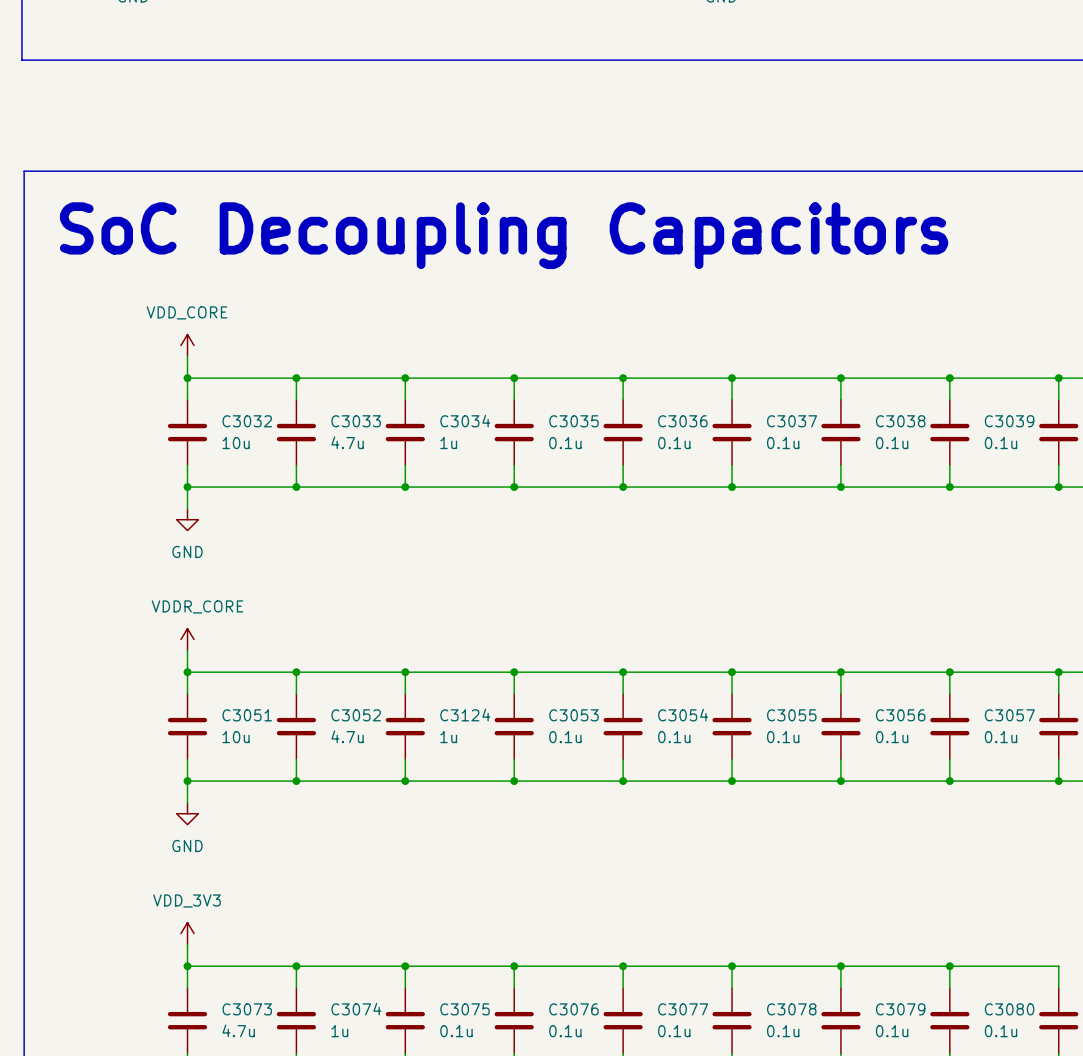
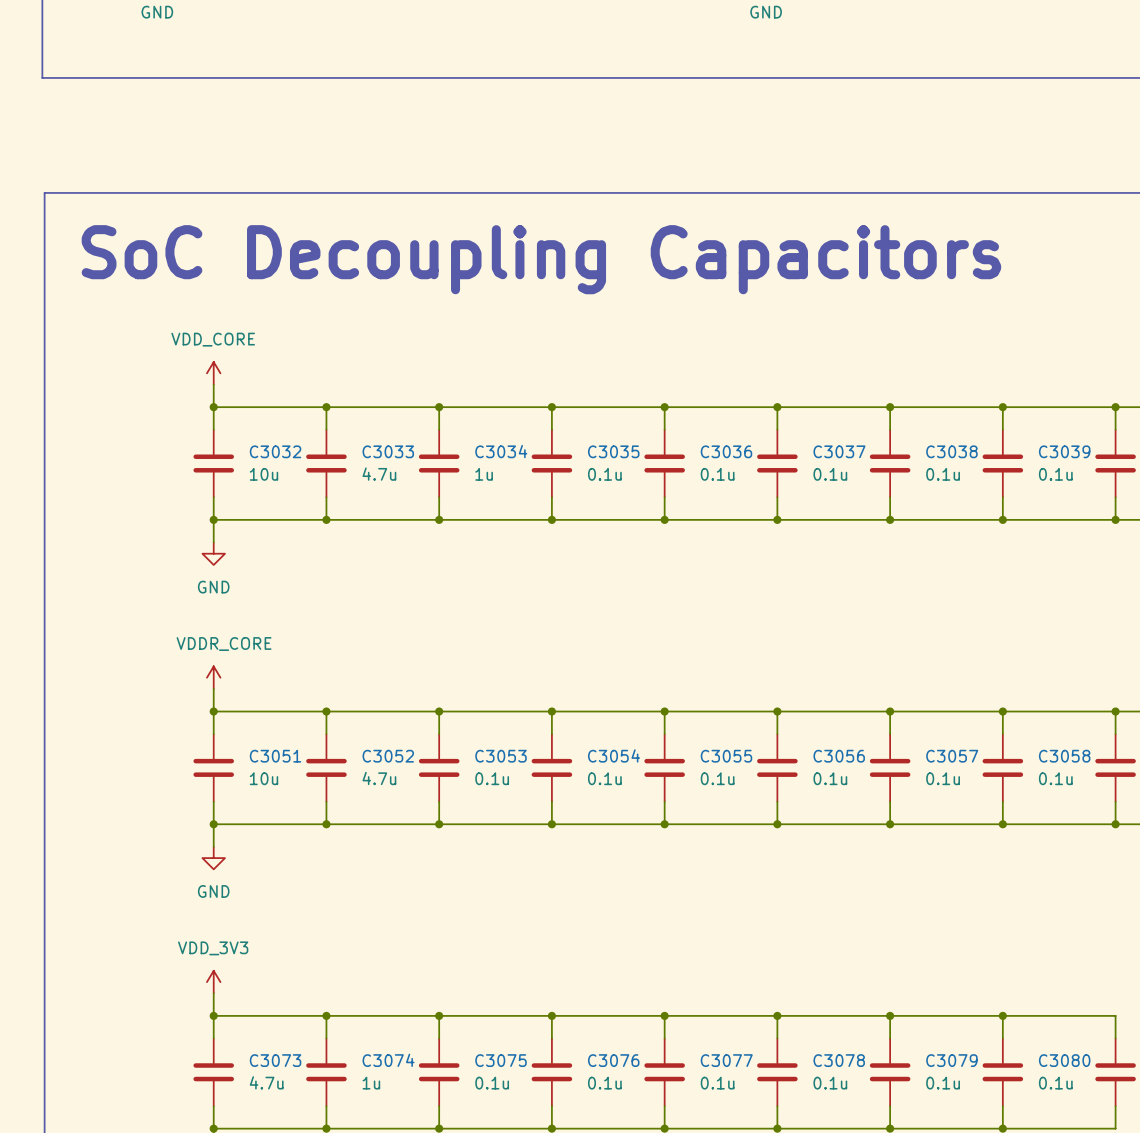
C3124 name: C3124 (465, 715) -> C3053 (501, 756)
C3053 name: C3053 (573, 715) -> C3054 (614, 755)
C3054 name: C3054 (683, 715) -> C3055 (726, 756)
C3055 name: C3055 (791, 715) -> C3056 (839, 756)
C3056 name: C3056 (900, 715) -> C3057 (952, 756)
C3057 name: C3057 (1009, 715) -> C3058 (1064, 756)
C3124 value: 1u (448, 737) -> 0.1u (492, 778)

